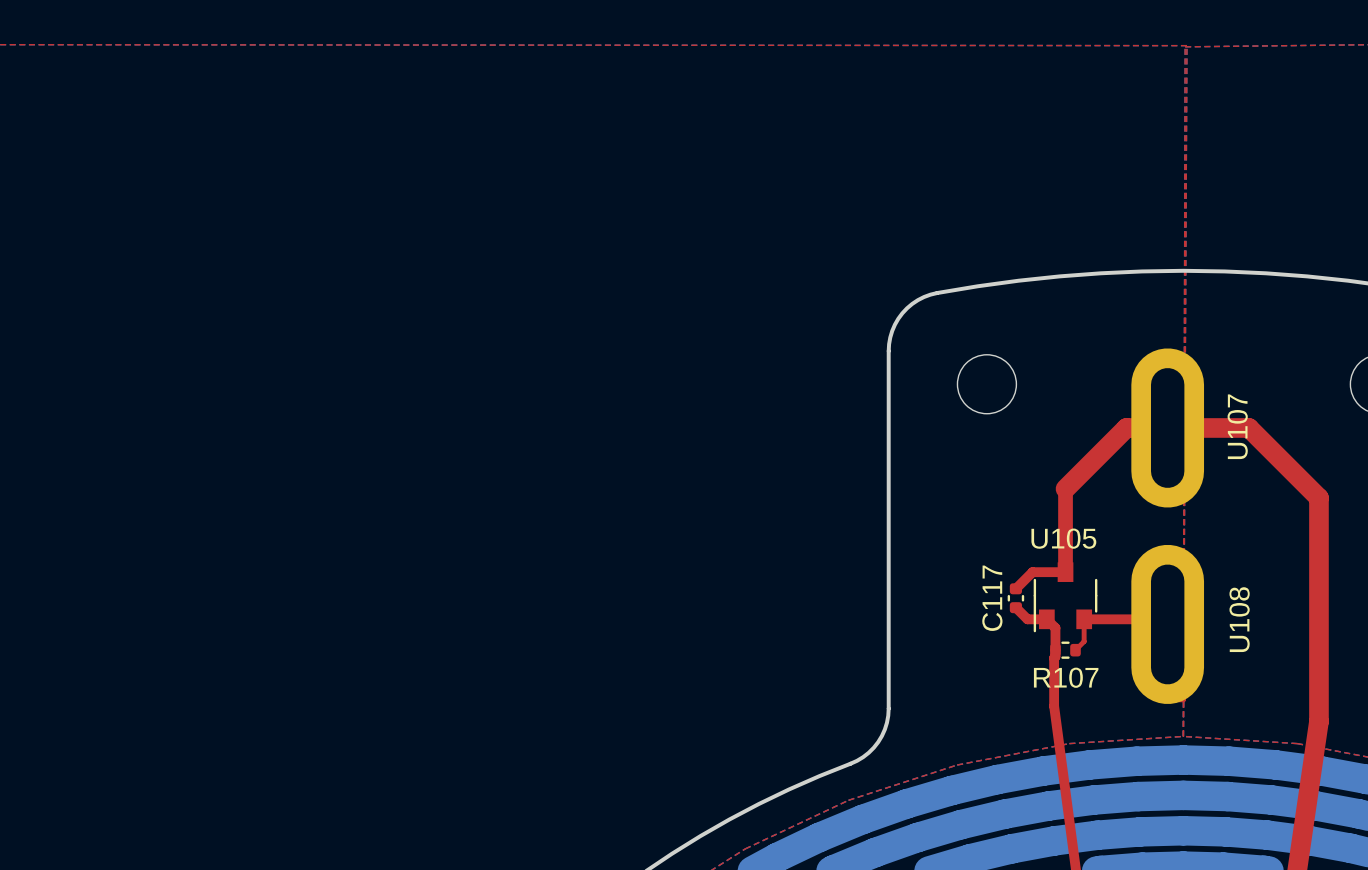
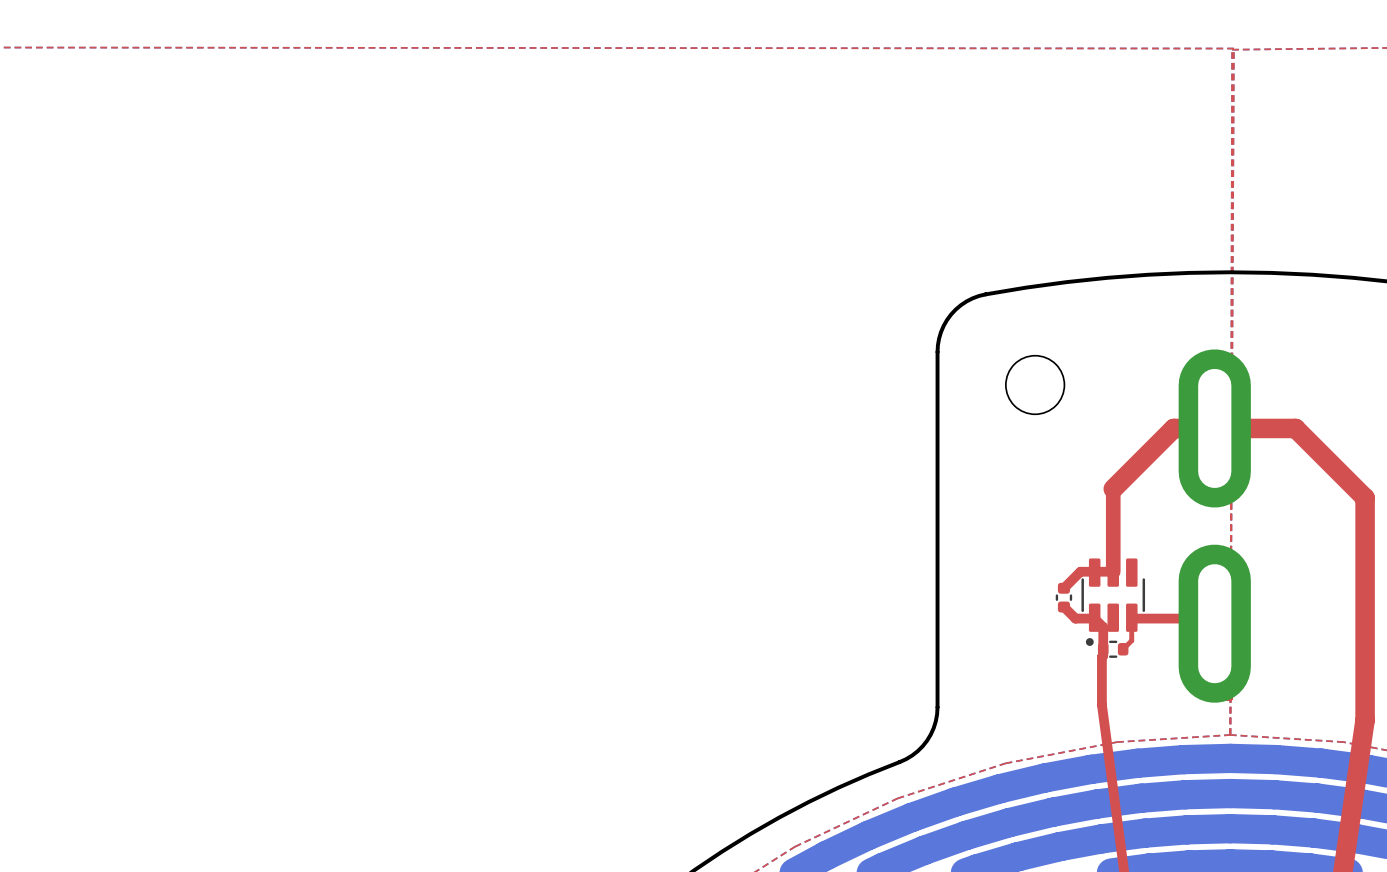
U107 name: U107 (1237, 426) -> none
U105: (1065, 597) -> none
C117 name: C117 (992, 598) -> none
part: none -> (1113, 602)
U108 name: U108 (1239, 619) -> none
R107 name: R107 (1066, 677) -> none

